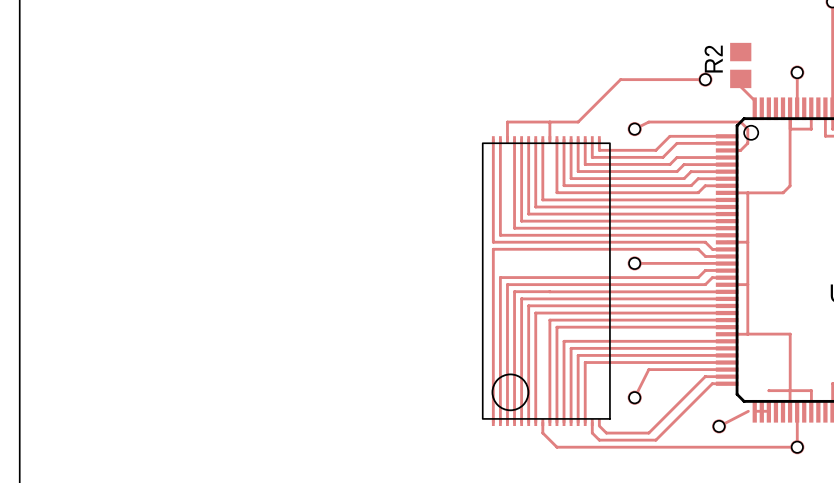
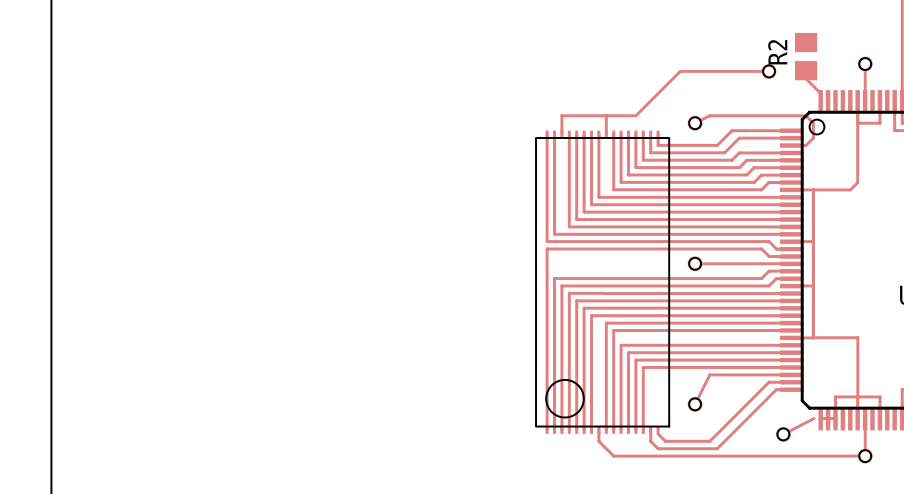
track: none -> (835, 397) (835, 418)

